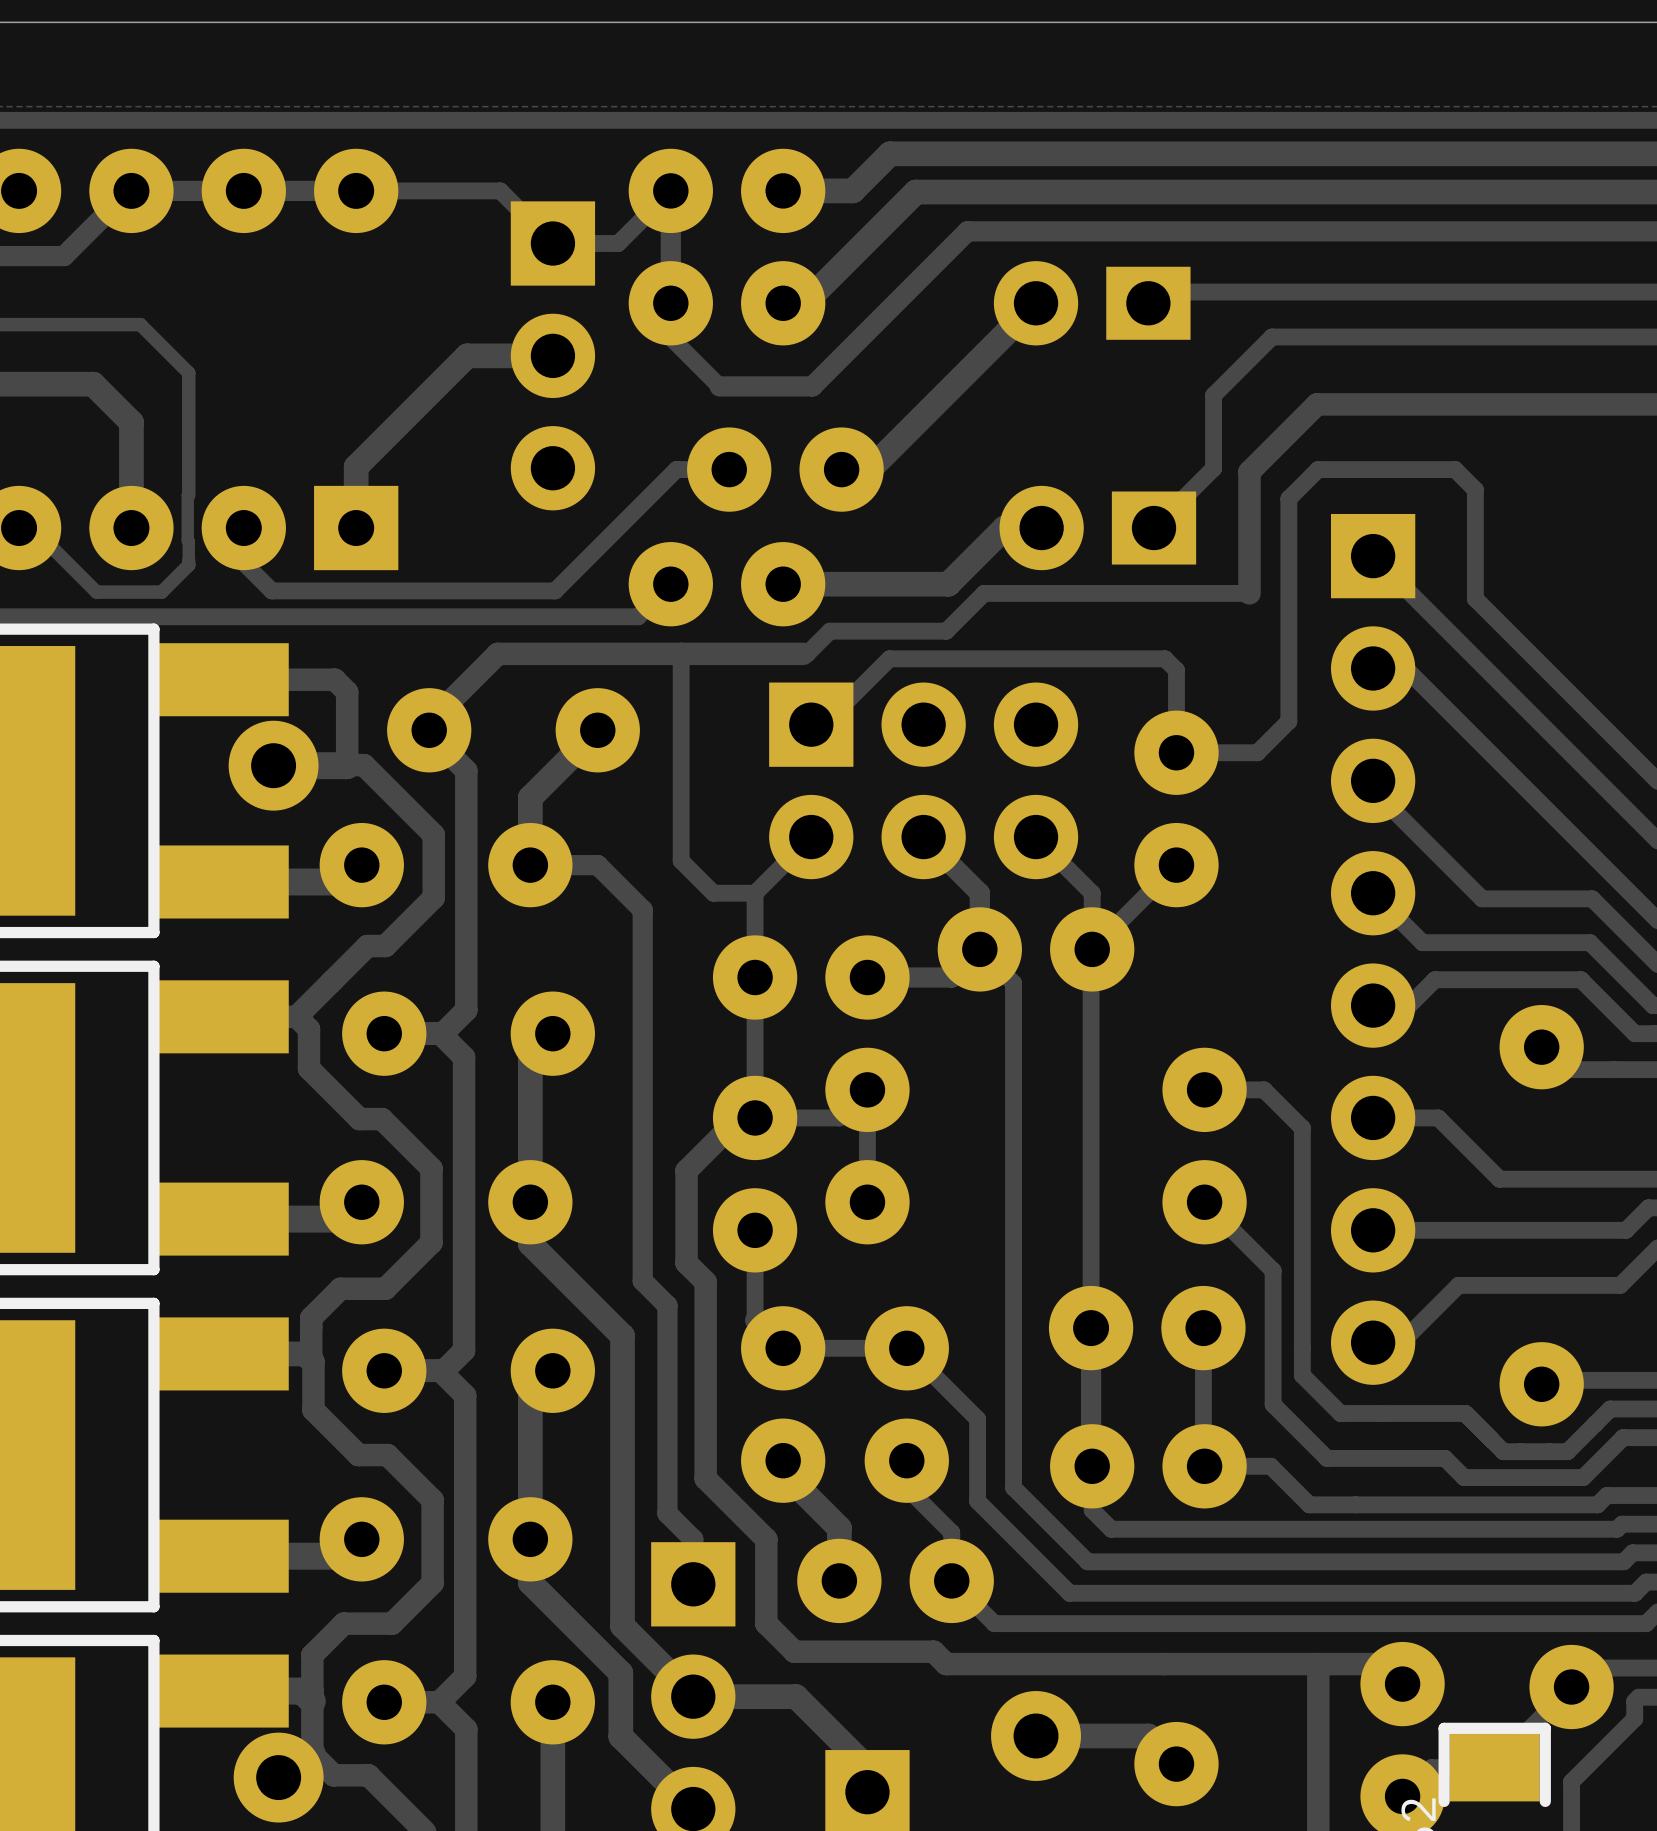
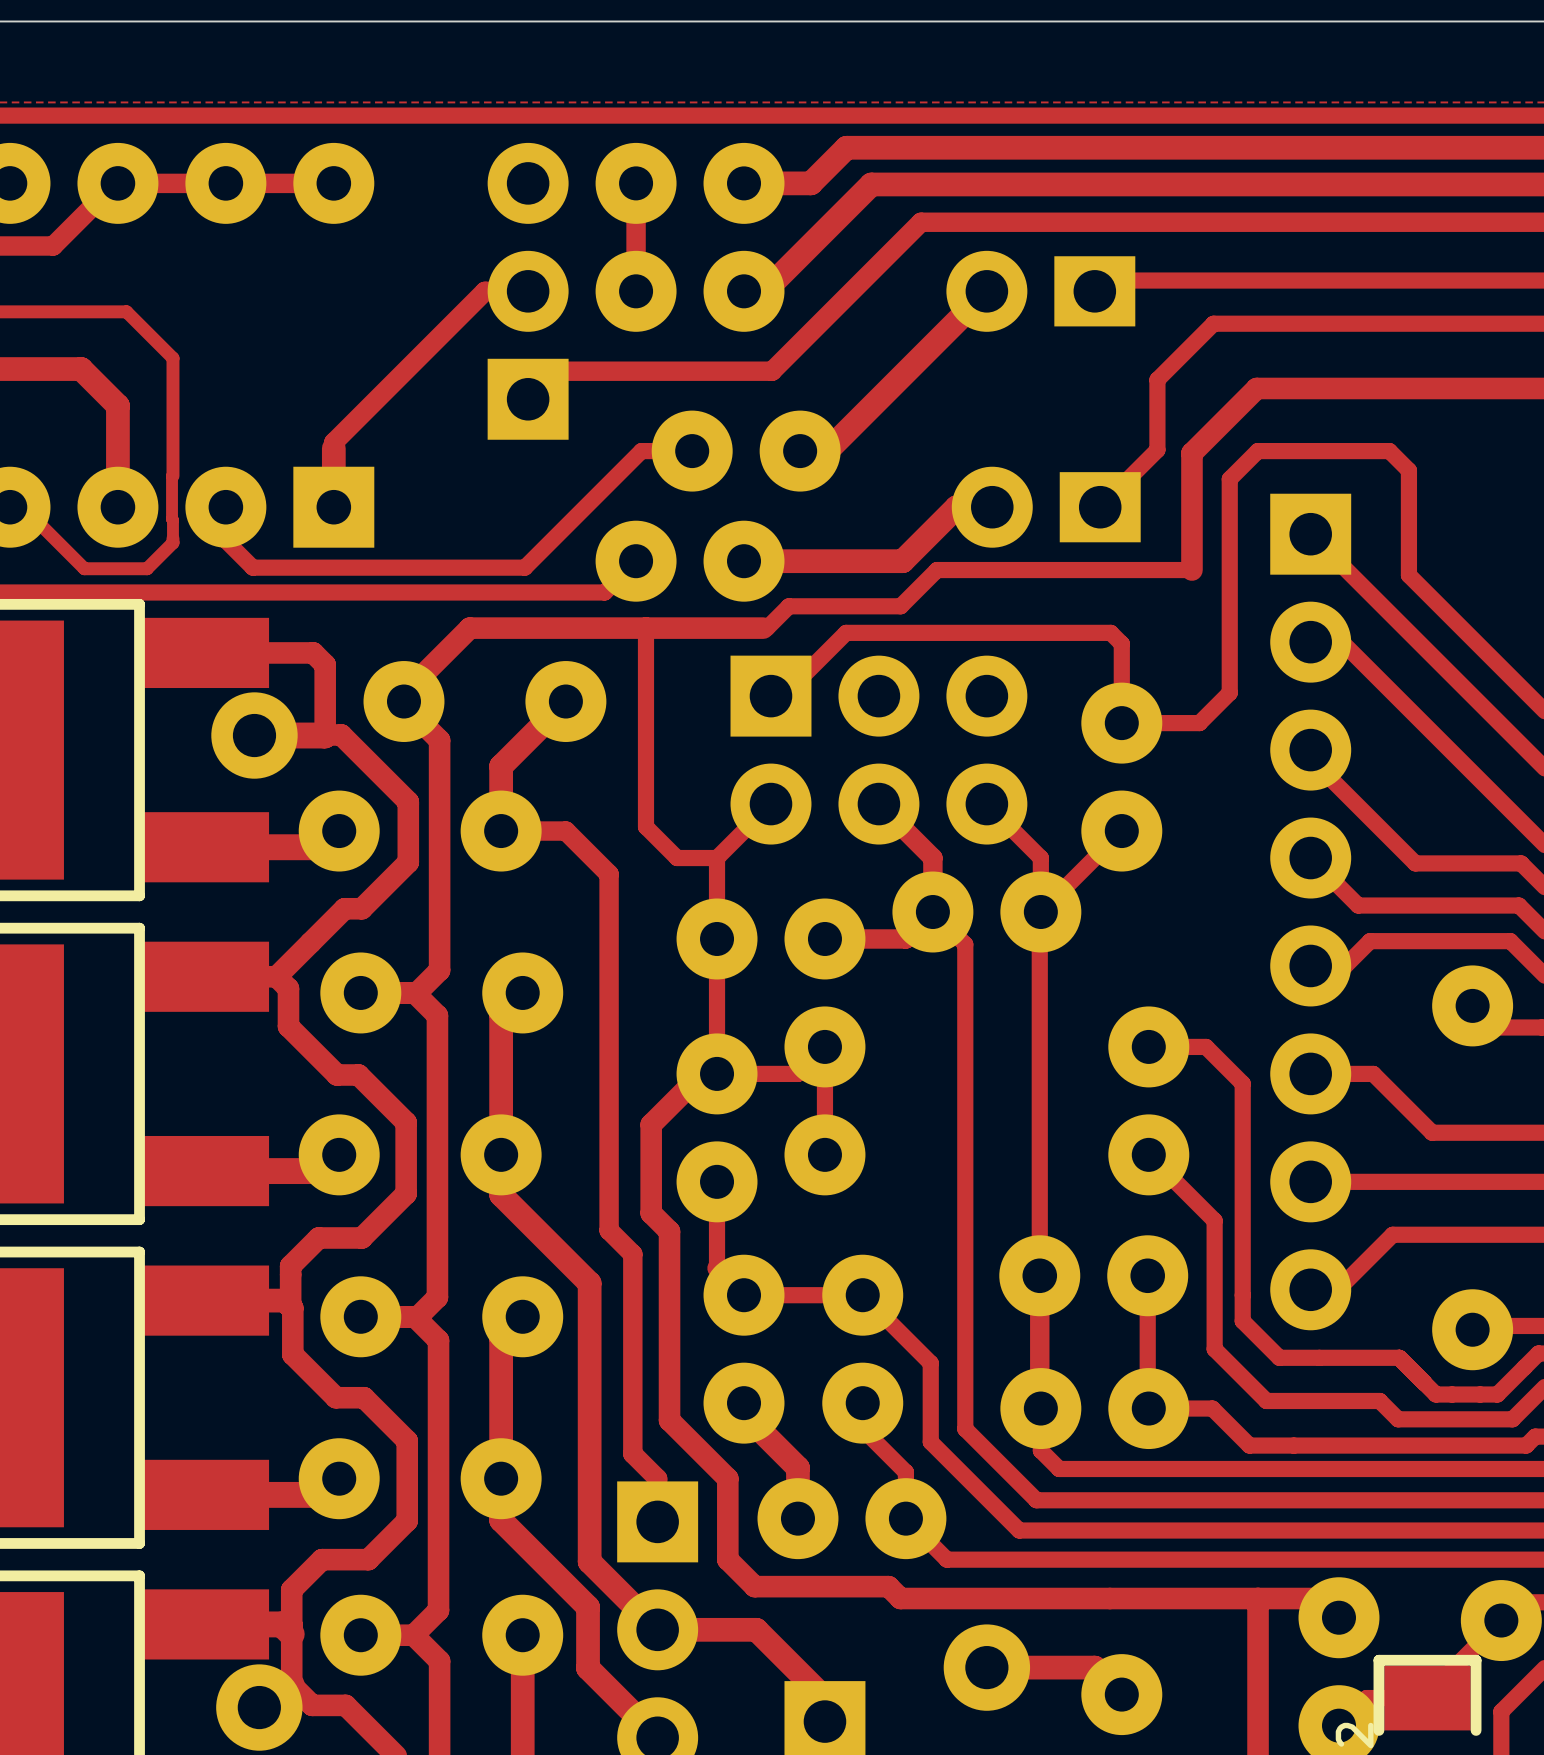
track: (356, 190) (500, 190) (552, 243) (618, 243) (670, 190) -> none
track: (670, 303) (670, 337) (719, 386) -> (556, 371) (682, 371)
track: (552, 355) (467, 355) (356, 466) -> (528, 291) (484, 291) (333, 442) (333, 448)
part rotation: 0° (552, 355) -> 180° (528, 291)

